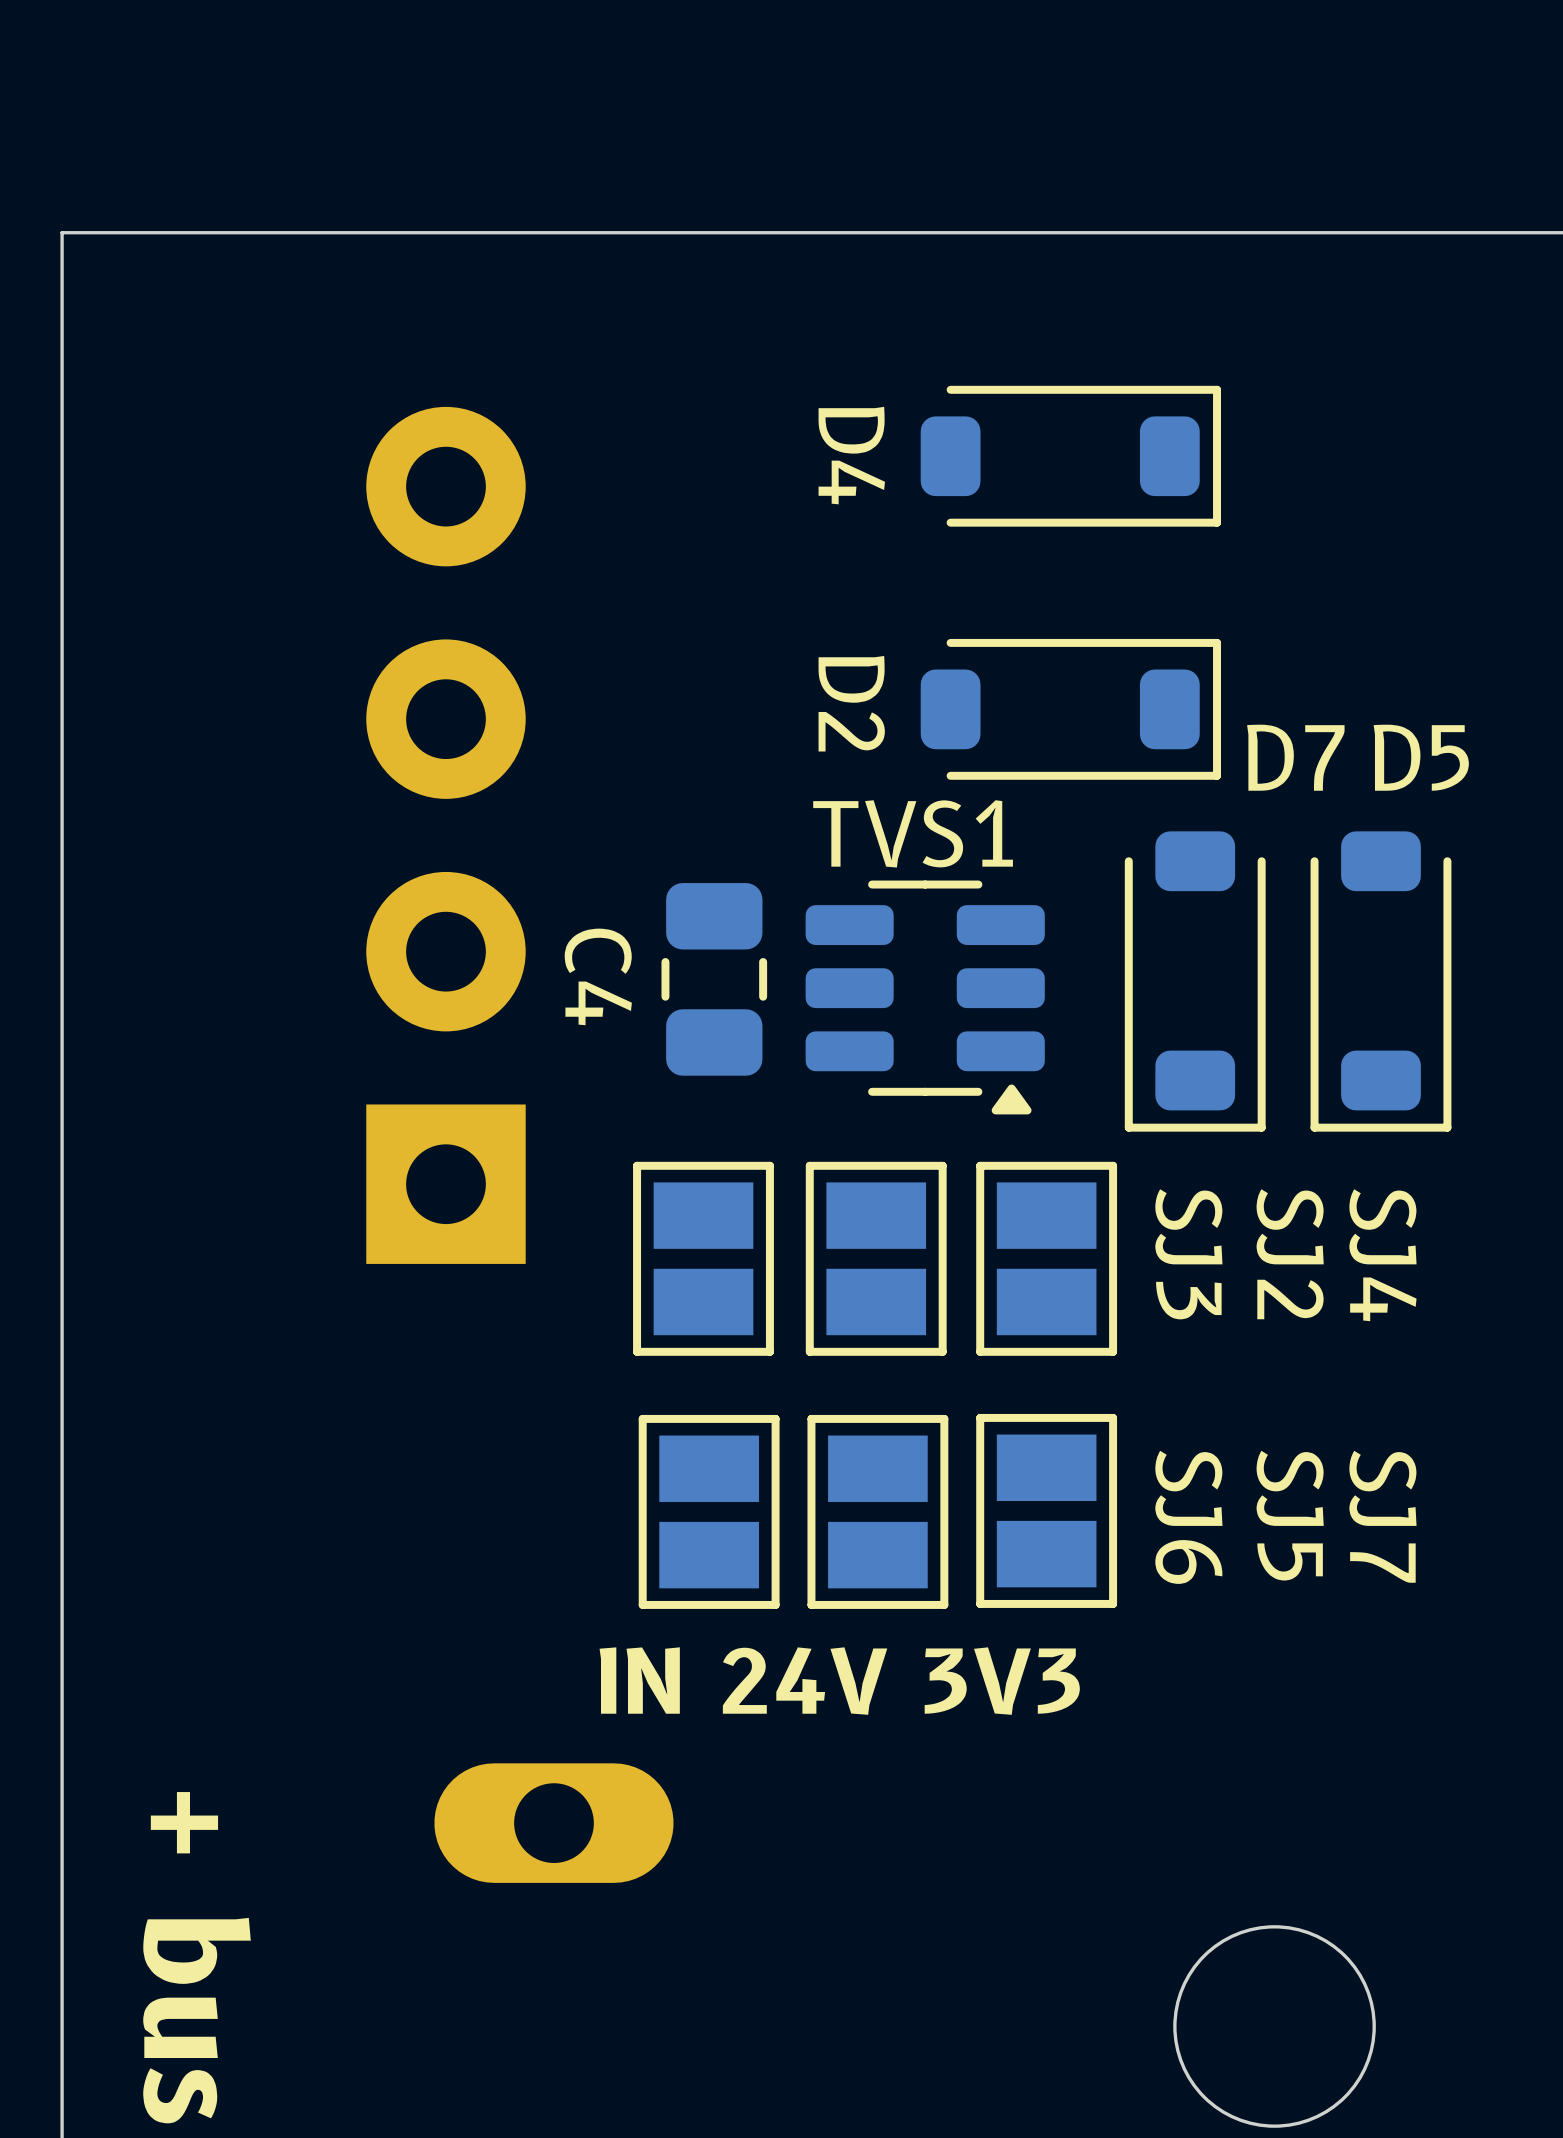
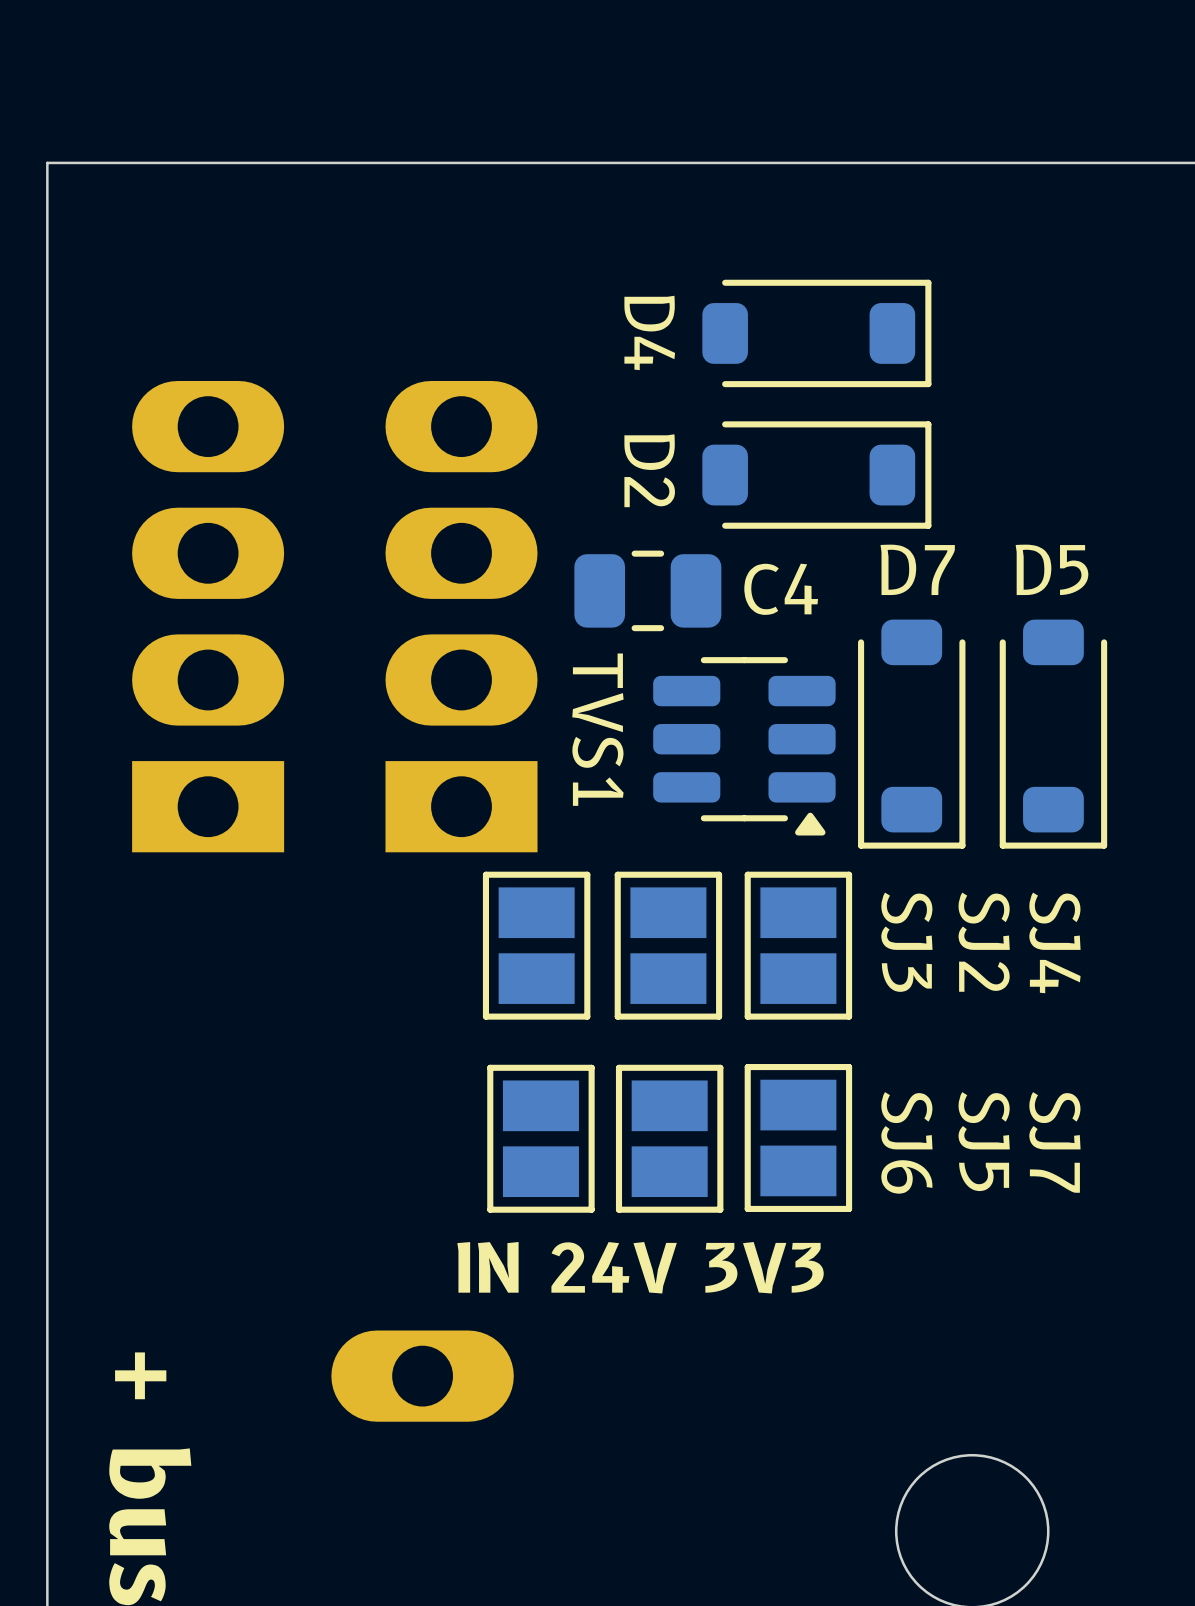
part footprint: [366, 406, 526, 1264] -> [132, 380, 538, 853]
D2 position: (1070, 709) -> (816, 475)
D7 name position: D7 (1295, 757) -> D7 (917, 569)
D5 name position: D5 (1421, 757) -> D5 (1051, 569)
TVS1 name rotation: 0° (913, 833) -> 90° clockwise (597, 729)
C4 name position: C4 (598, 976) -> C4 (781, 589)
C4 rotation: 0° (714, 979) -> 90° clockwise (647, 590)
C4 position: (714, 979) -> (647, 590)
TVS1 position: (925, 997) -> (744, 746)

